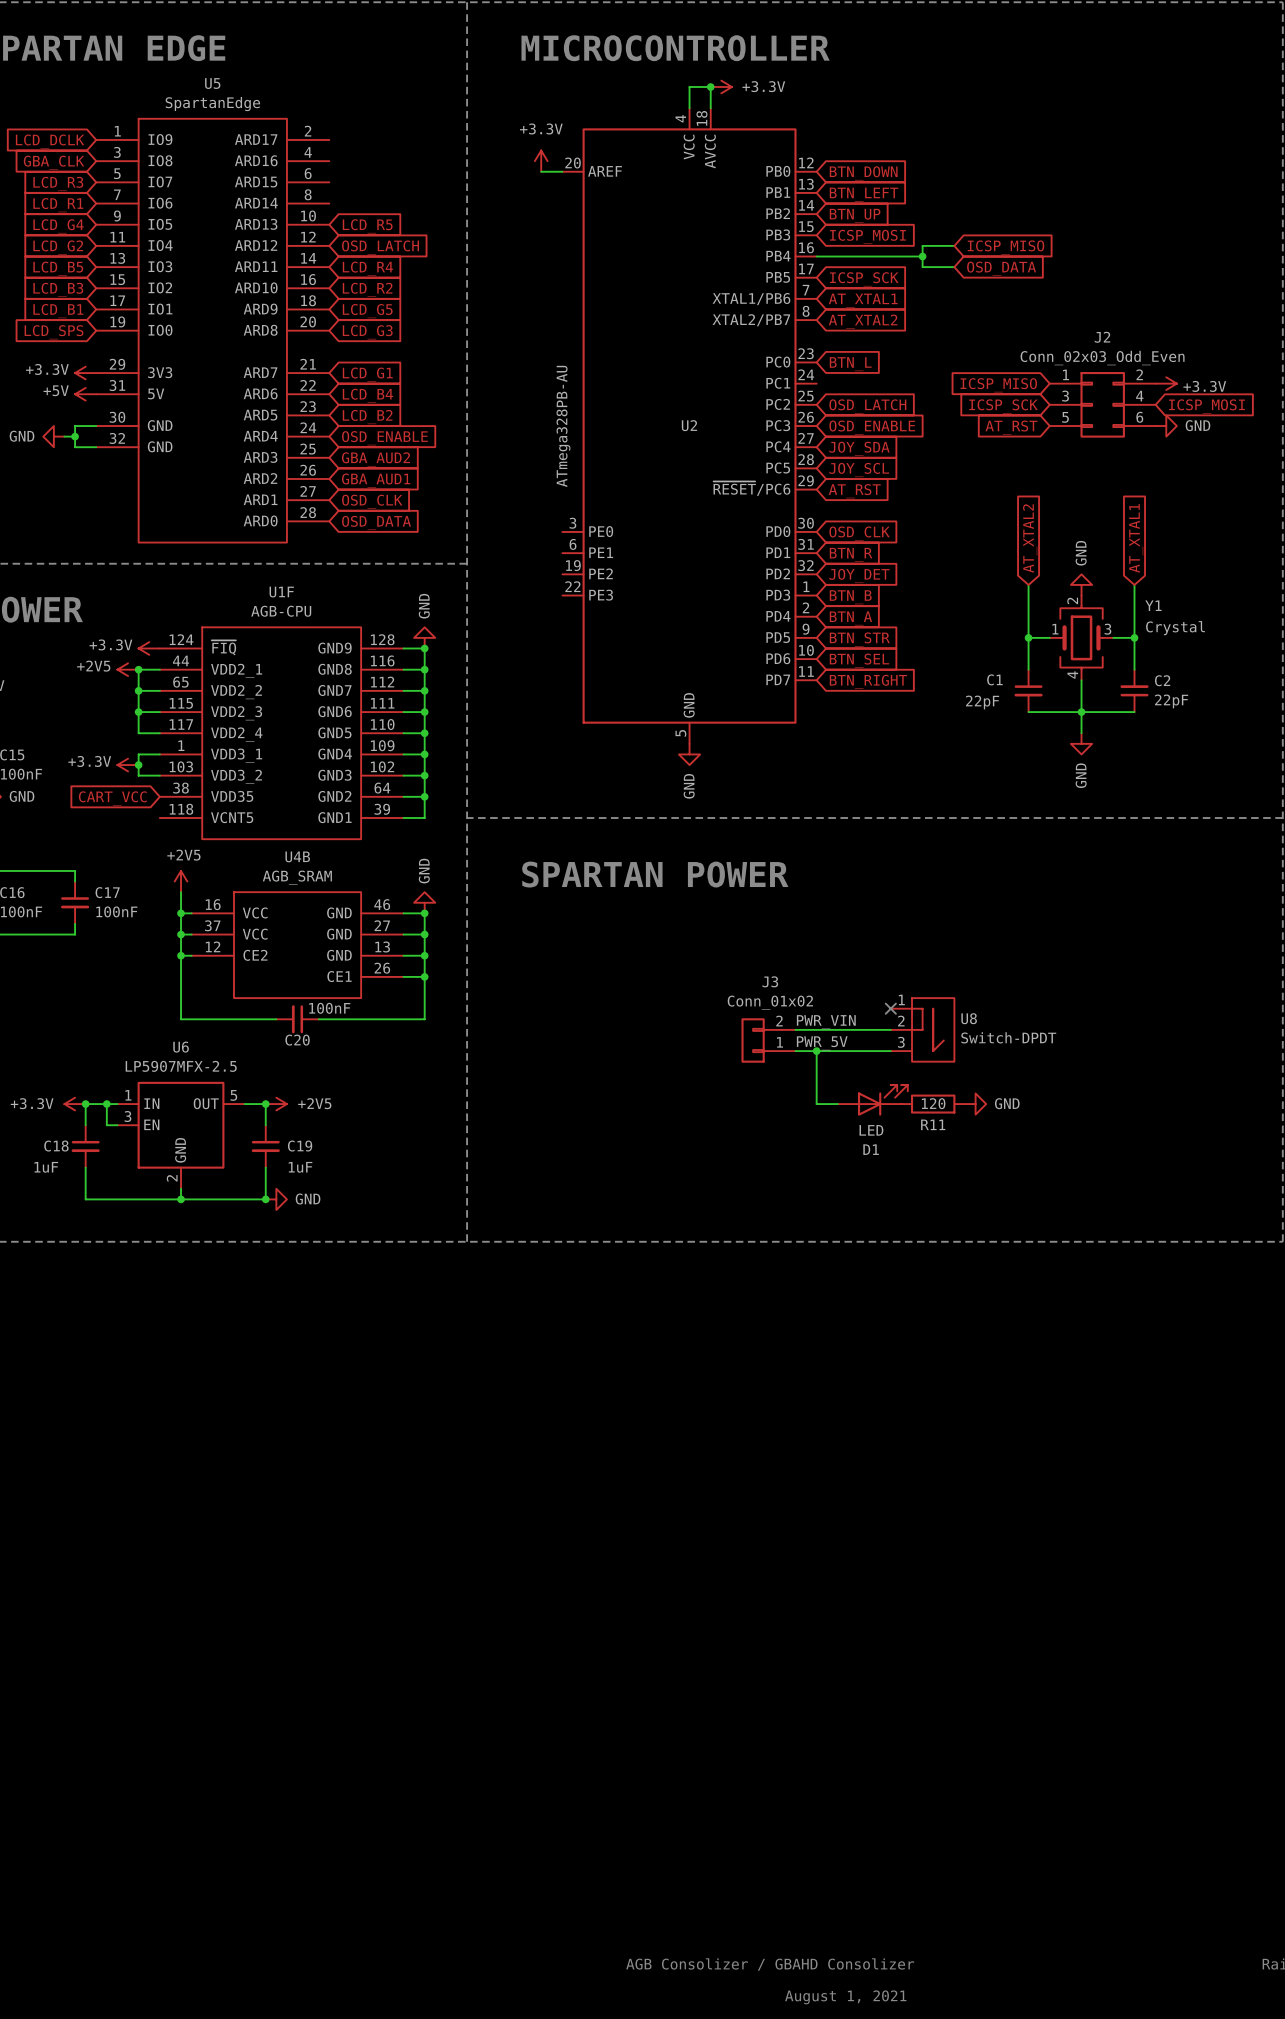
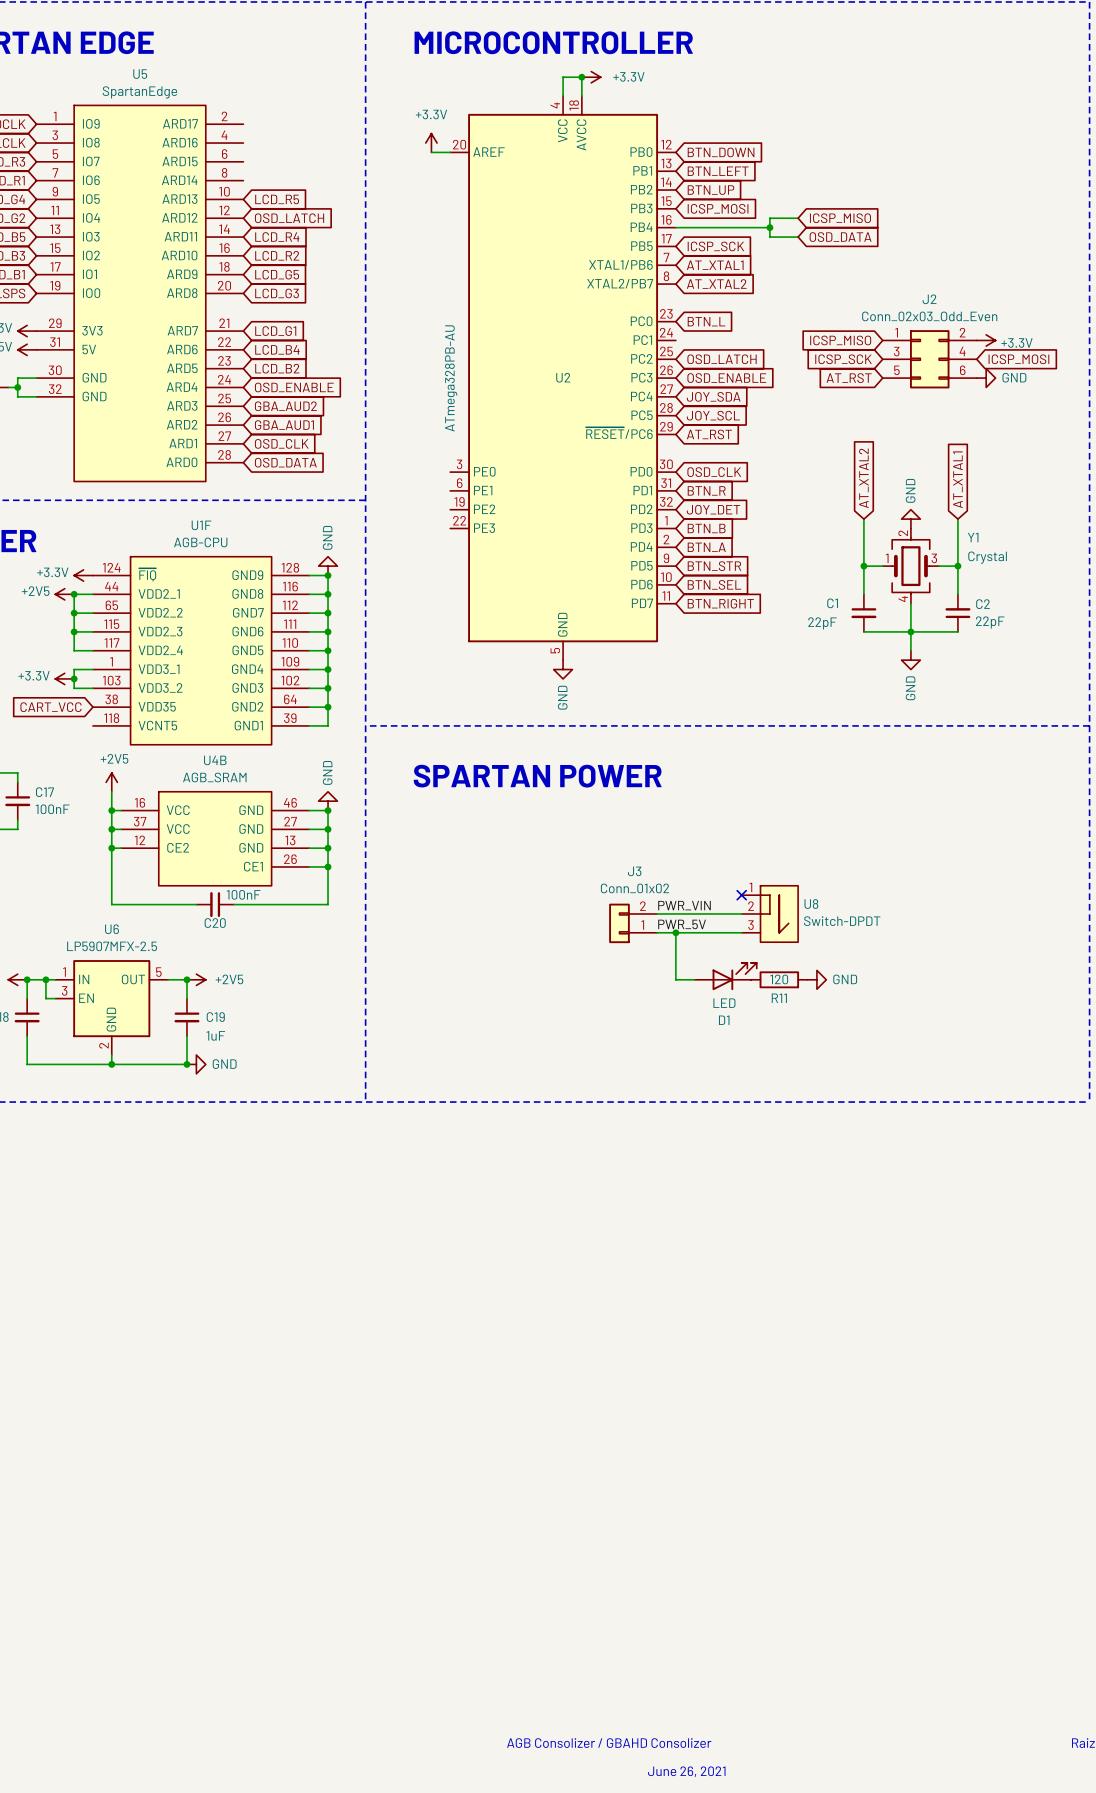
text: August 1, 2021 (845, 1997) -> June 26, 2021 (686, 1771)

